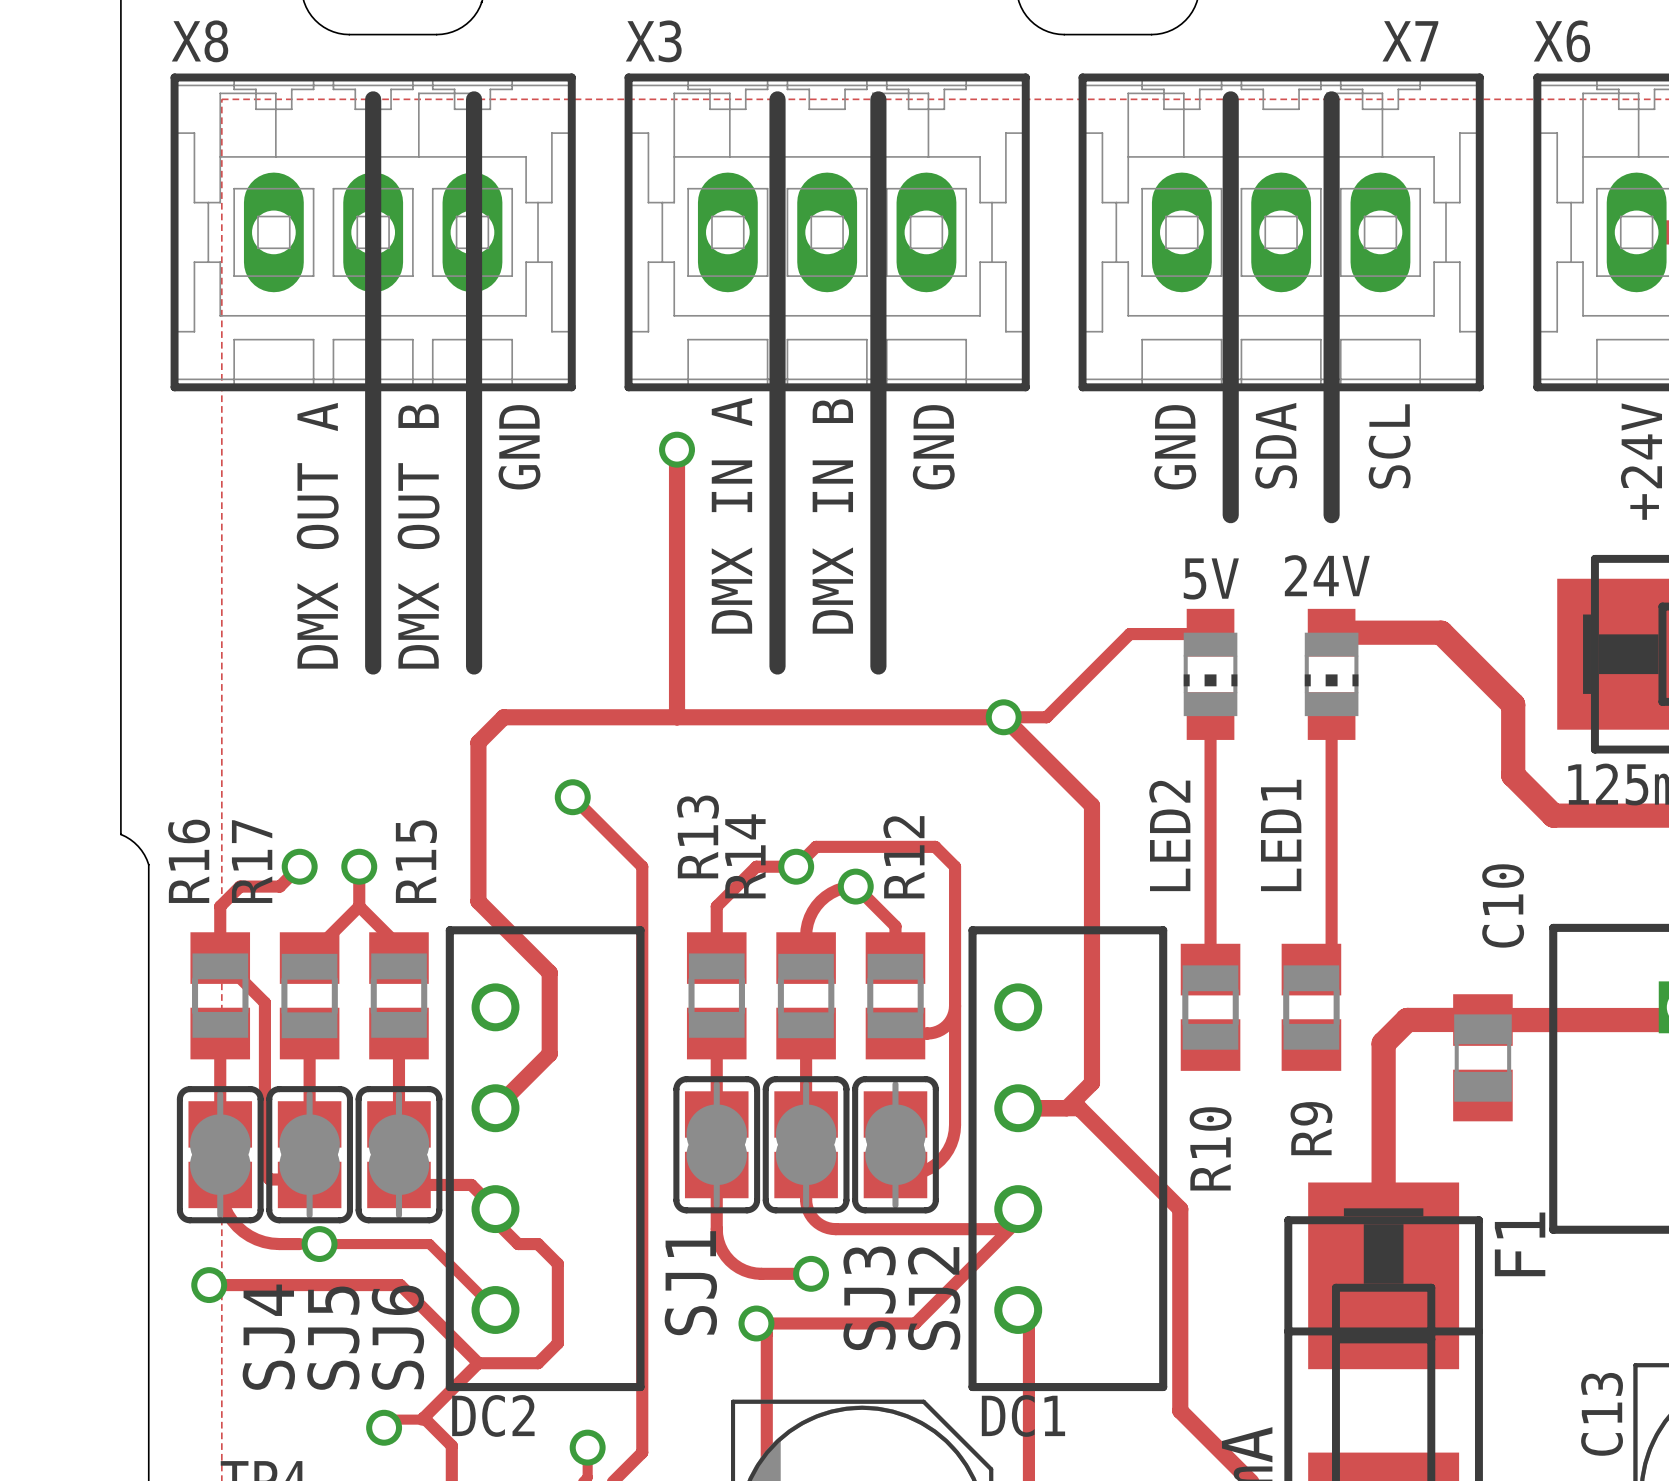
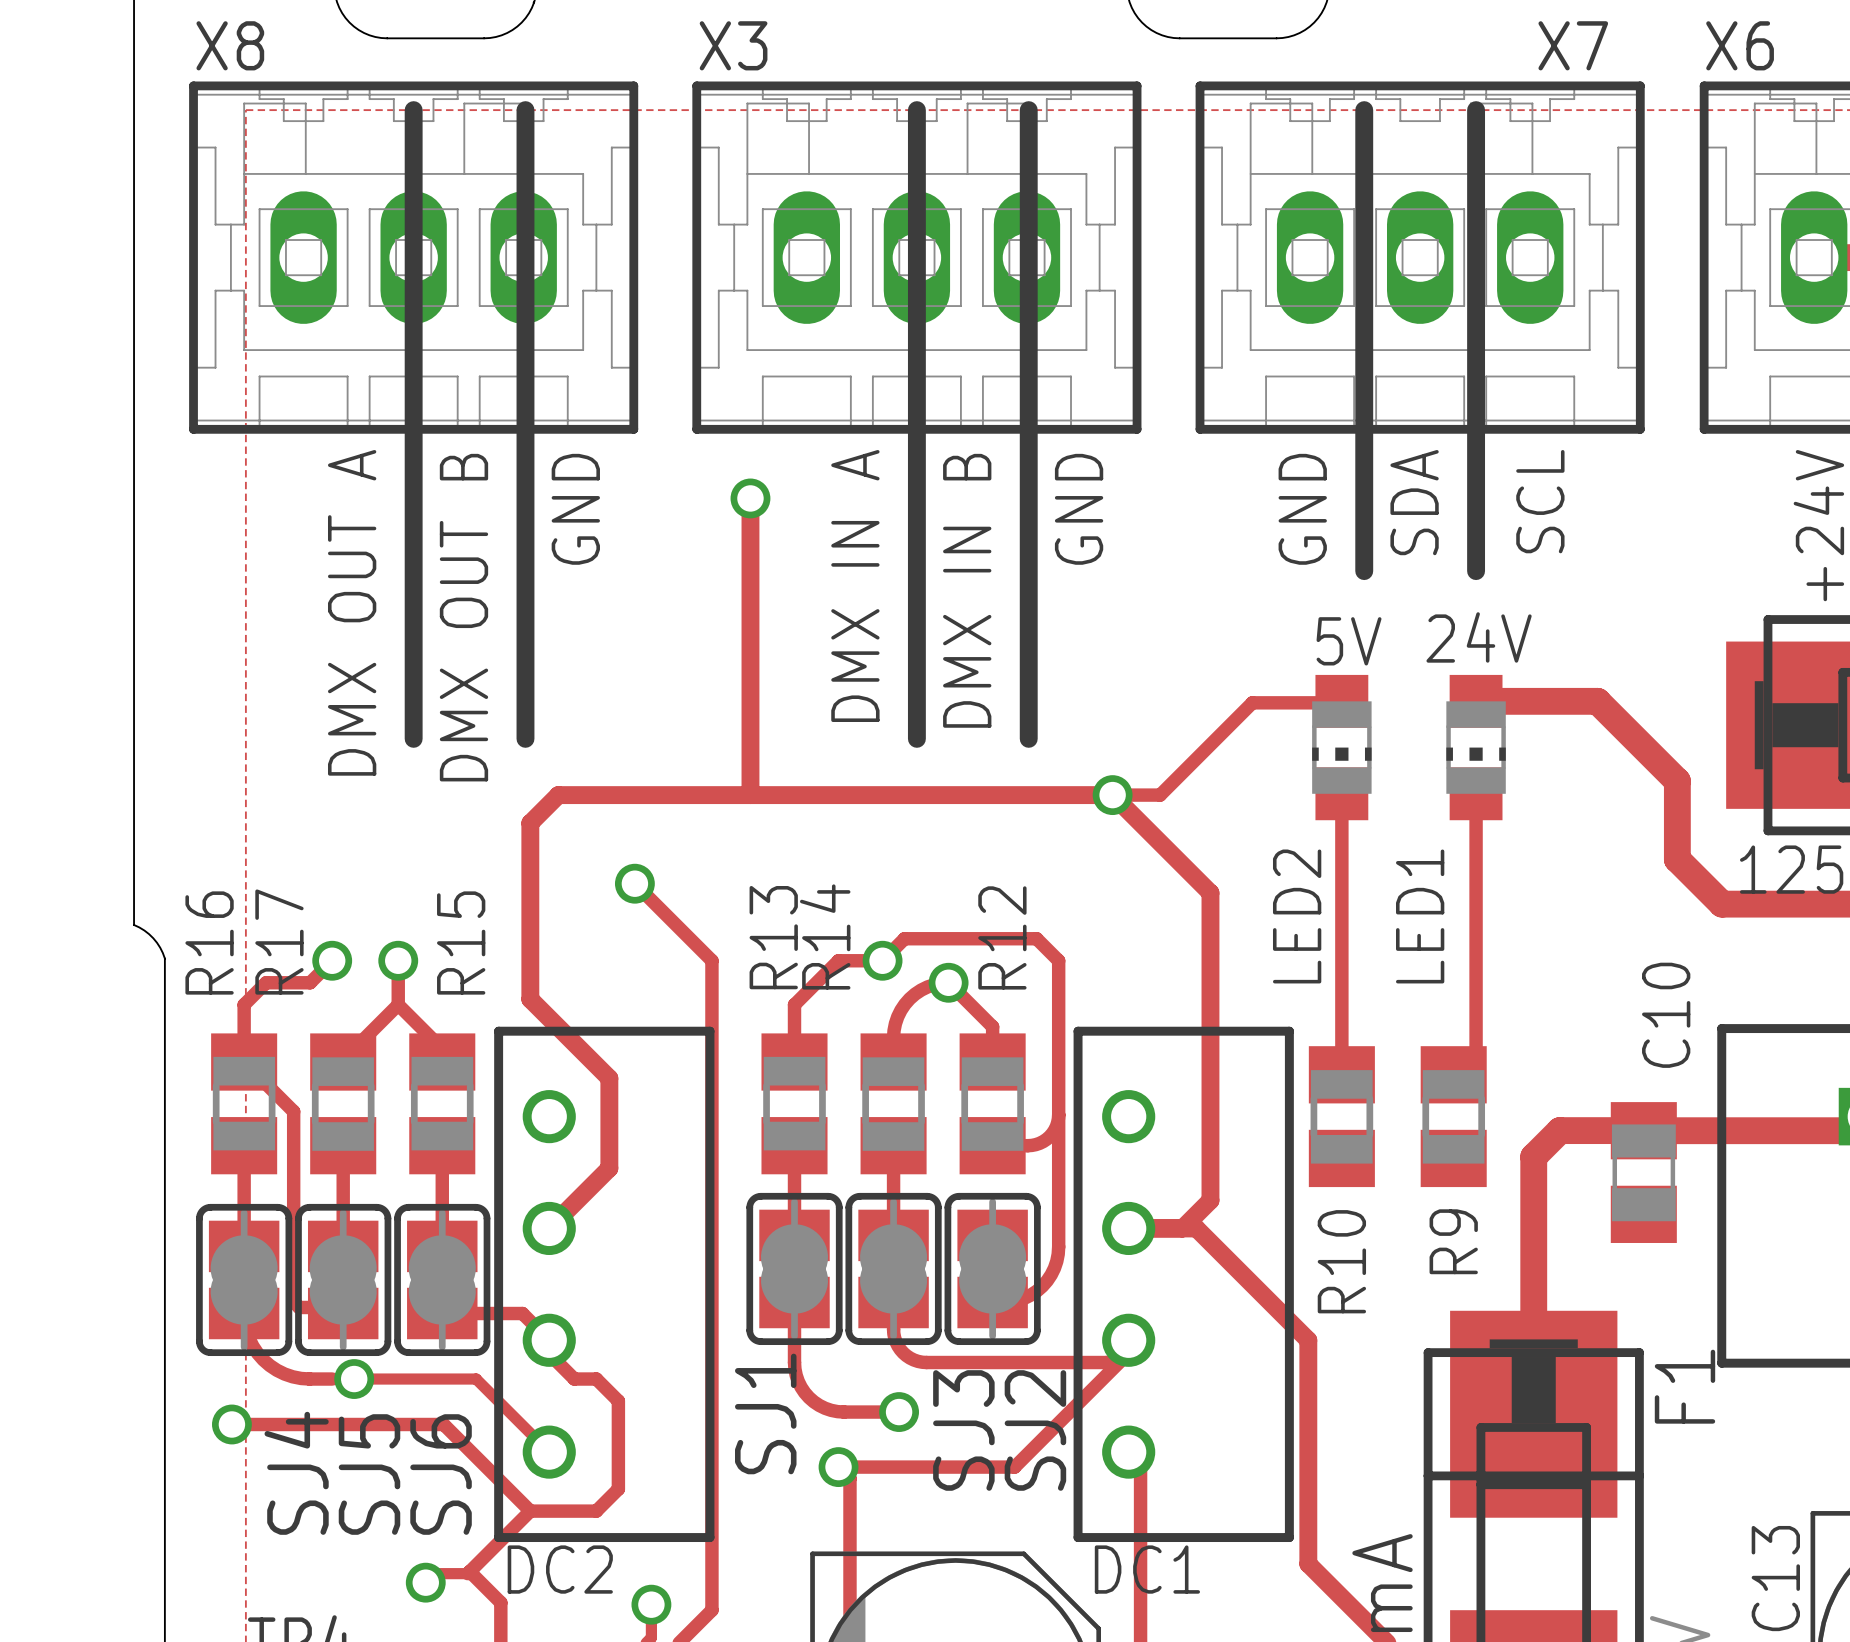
line: (777, 99) (777, 666) -> (916, 110) (916, 738)
line: (878, 99) (878, 666) -> (1028, 110) (1028, 738)
text position: GND (933, 447) -> GND (1079, 509)
text position: DMX IN A (731, 515) -> DMX IN A (855, 586)
text position: DMX IN B (832, 516) -> DMX IN B (967, 590)

